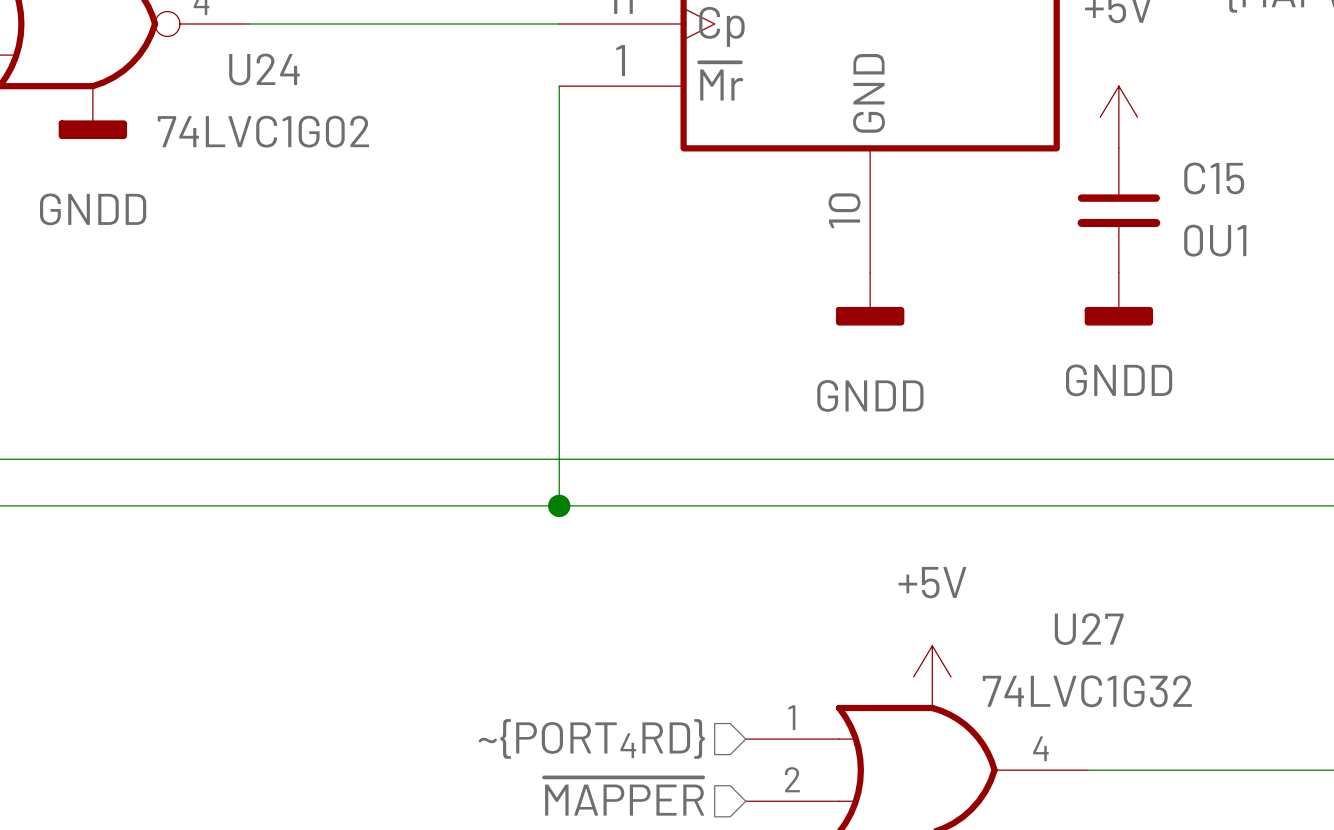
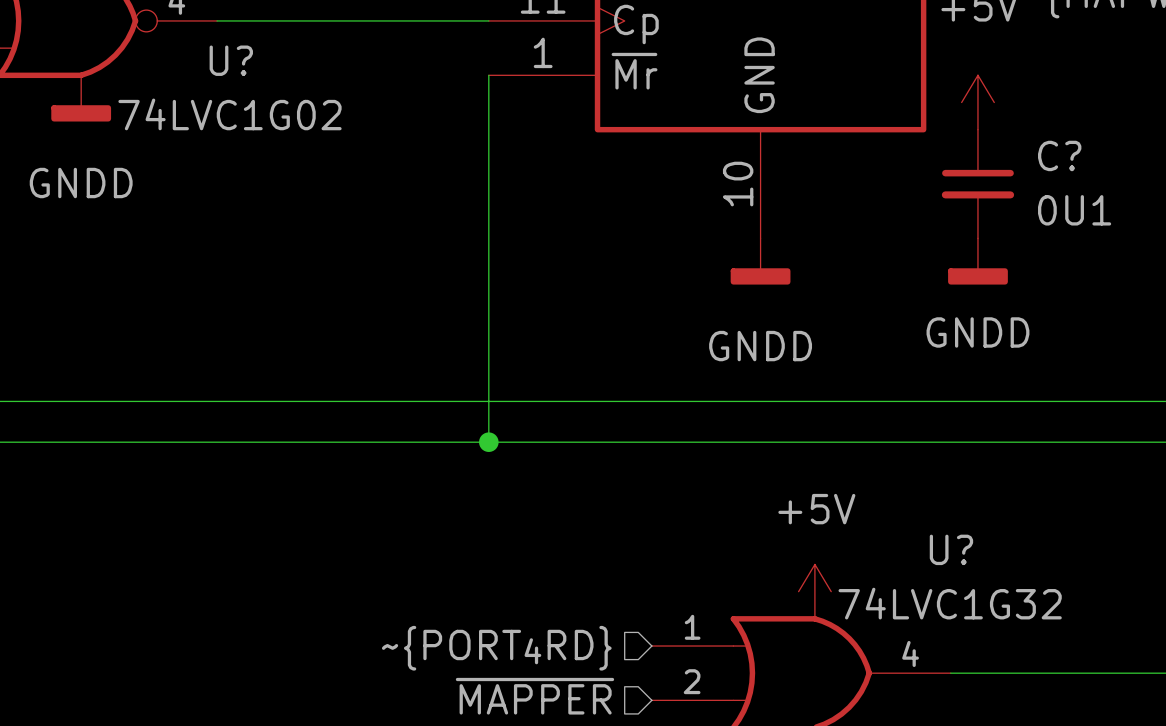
U24 name: U24 (264, 69) -> U? (231, 60)
C15 name: C15 (1214, 178) -> C? (1059, 155)
U27 name: U27 (1089, 629) -> U? (951, 549)

